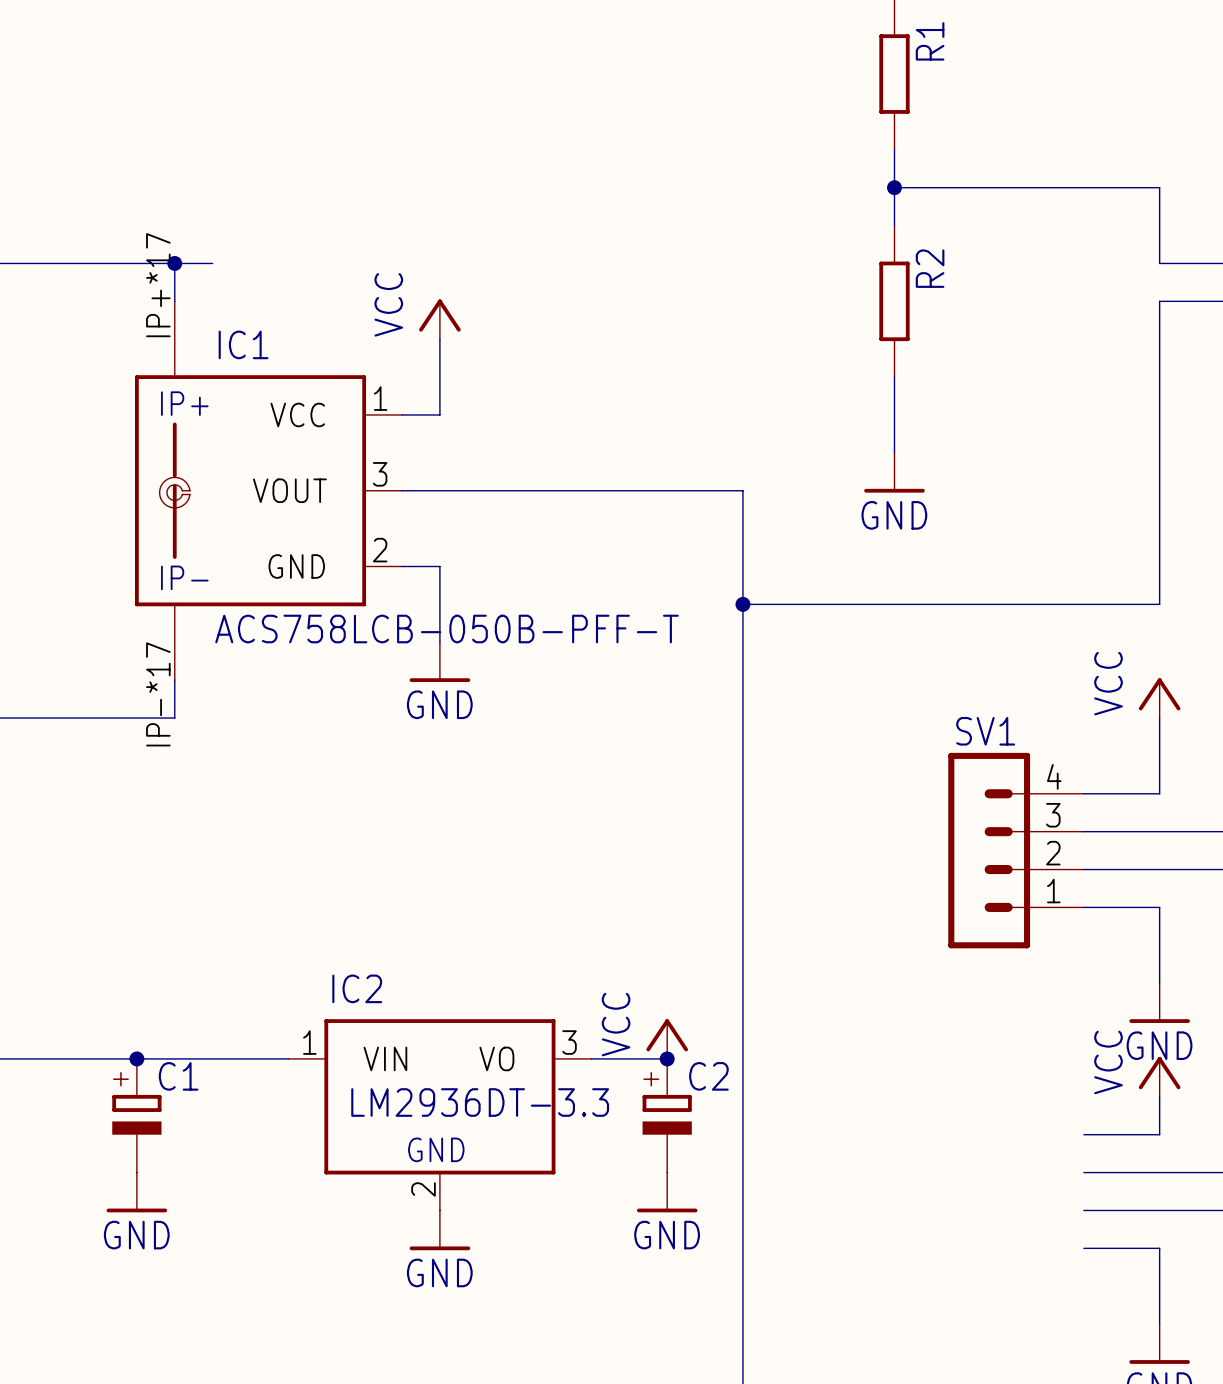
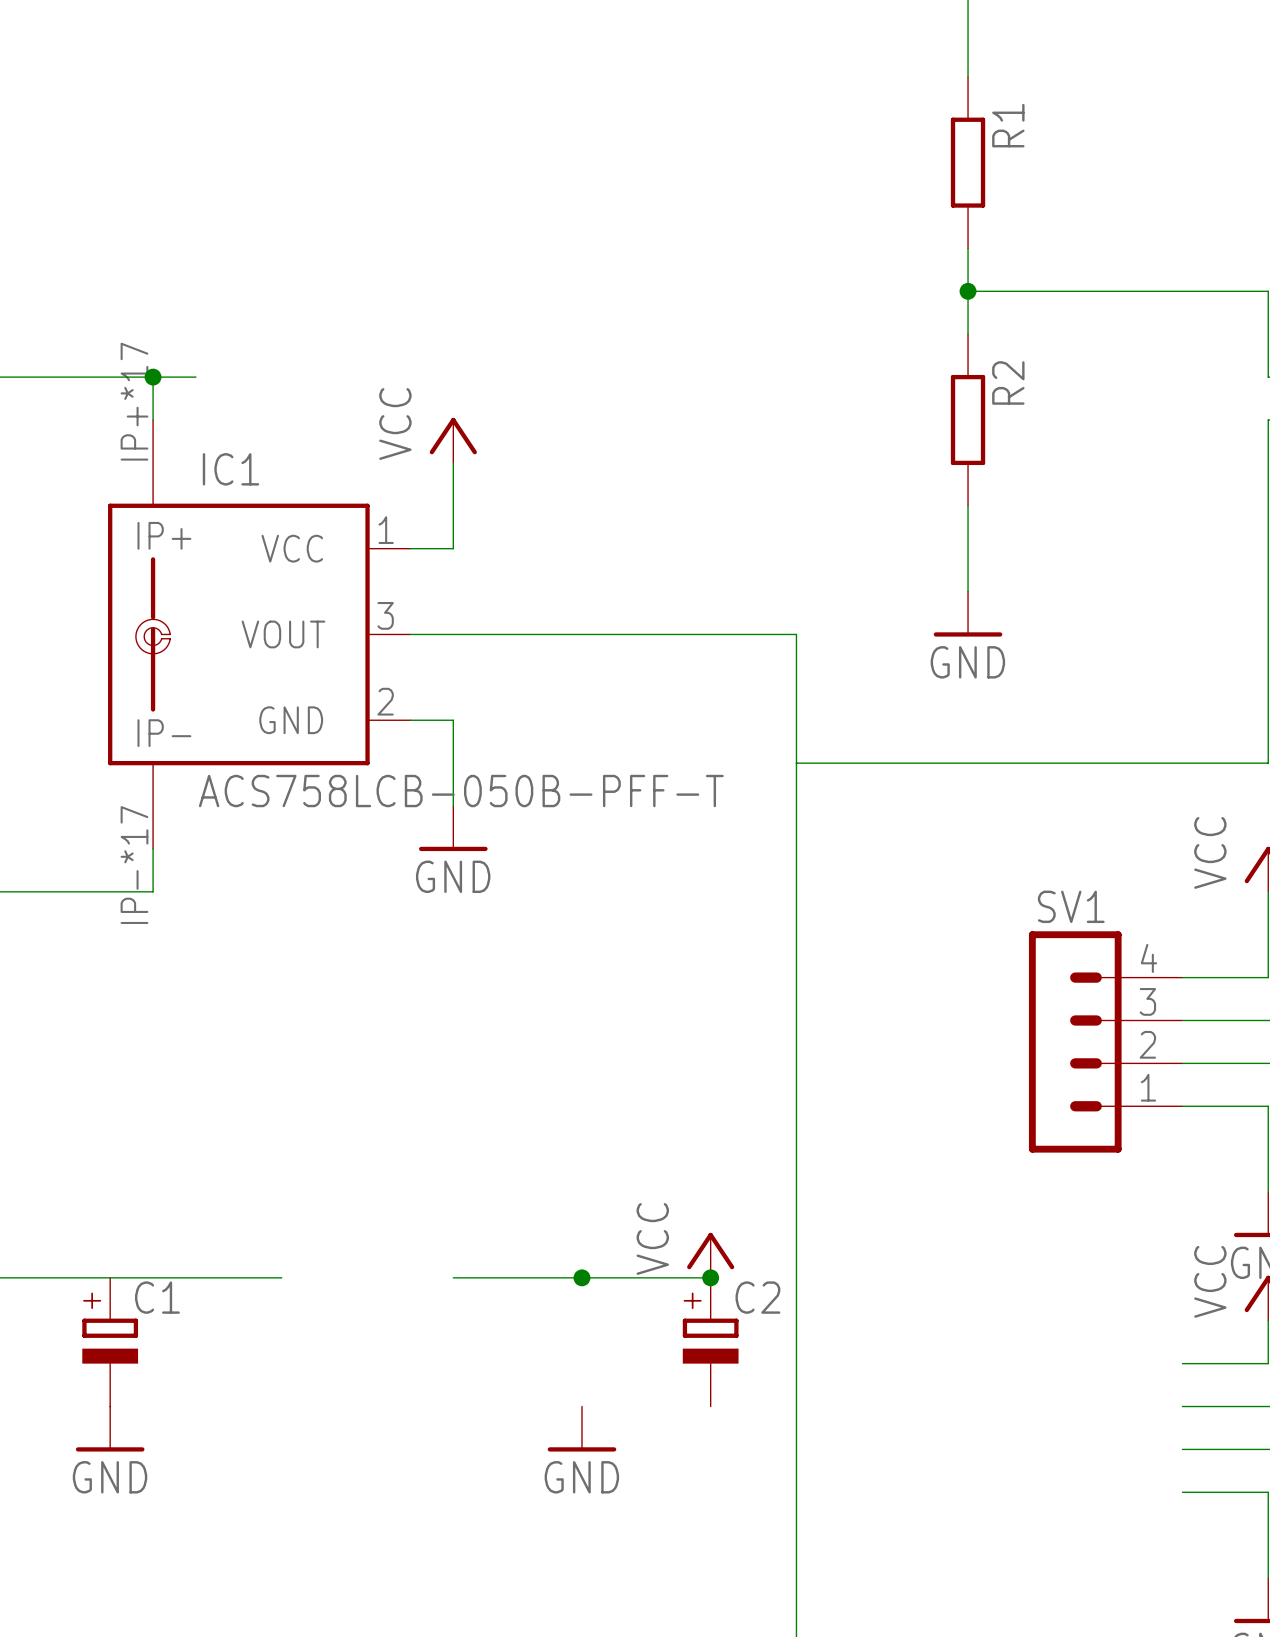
junction: (742, 604) -> none
junction: (136, 1058) -> none
wire: none -> (453, 1277) (624, 1277)
junction: none -> (581, 1277)
IC2: LM2936DT-3.3 (439, 1114) -> none
power symbol: none -> GND (581, 1429)
power symbol: GND (667, 1192) -> none
power symbol: GND (439, 1230) -> none

